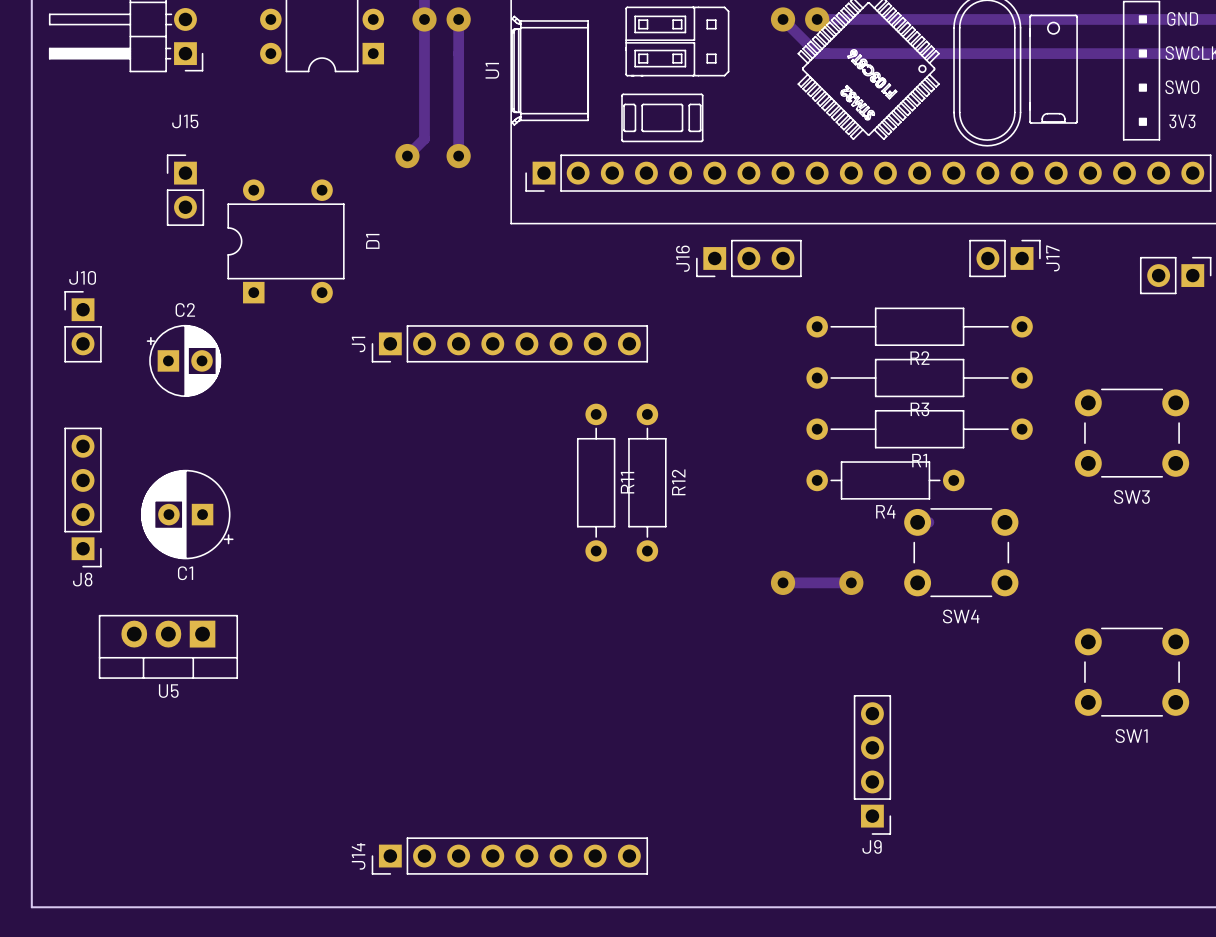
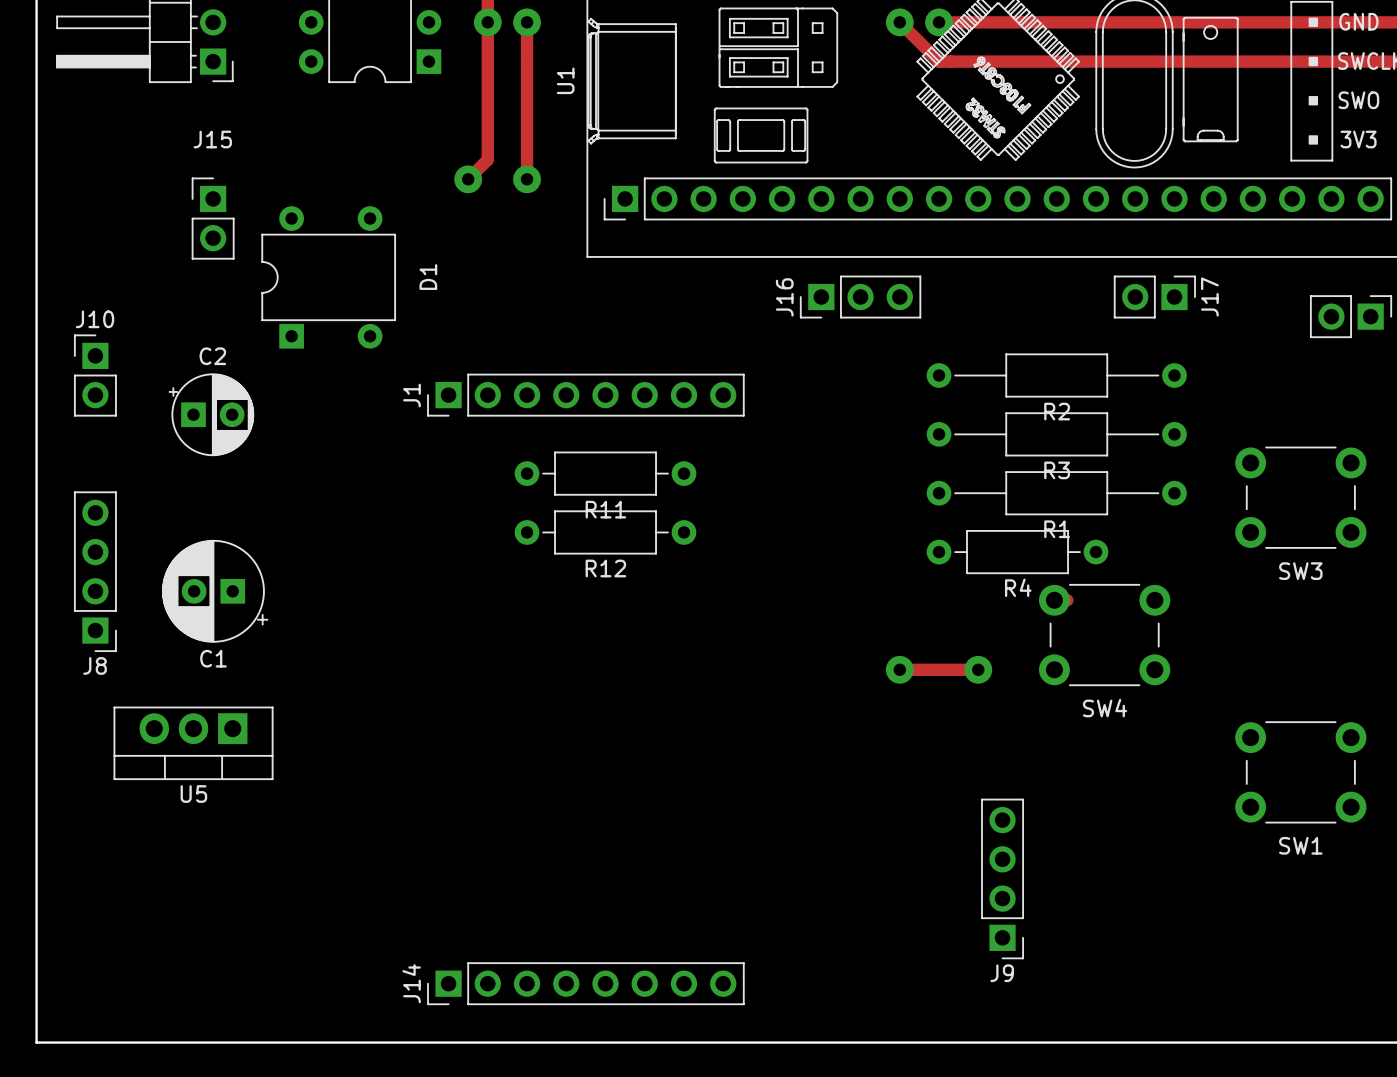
R11 rotation: 0° (596, 482) -> 90° clockwise (605, 473)
R11 position: (596, 482) -> (605, 473)
R12 rotation: 0° (647, 482) -> 90° clockwise (605, 532)
R12 position: (647, 482) -> (605, 532)

